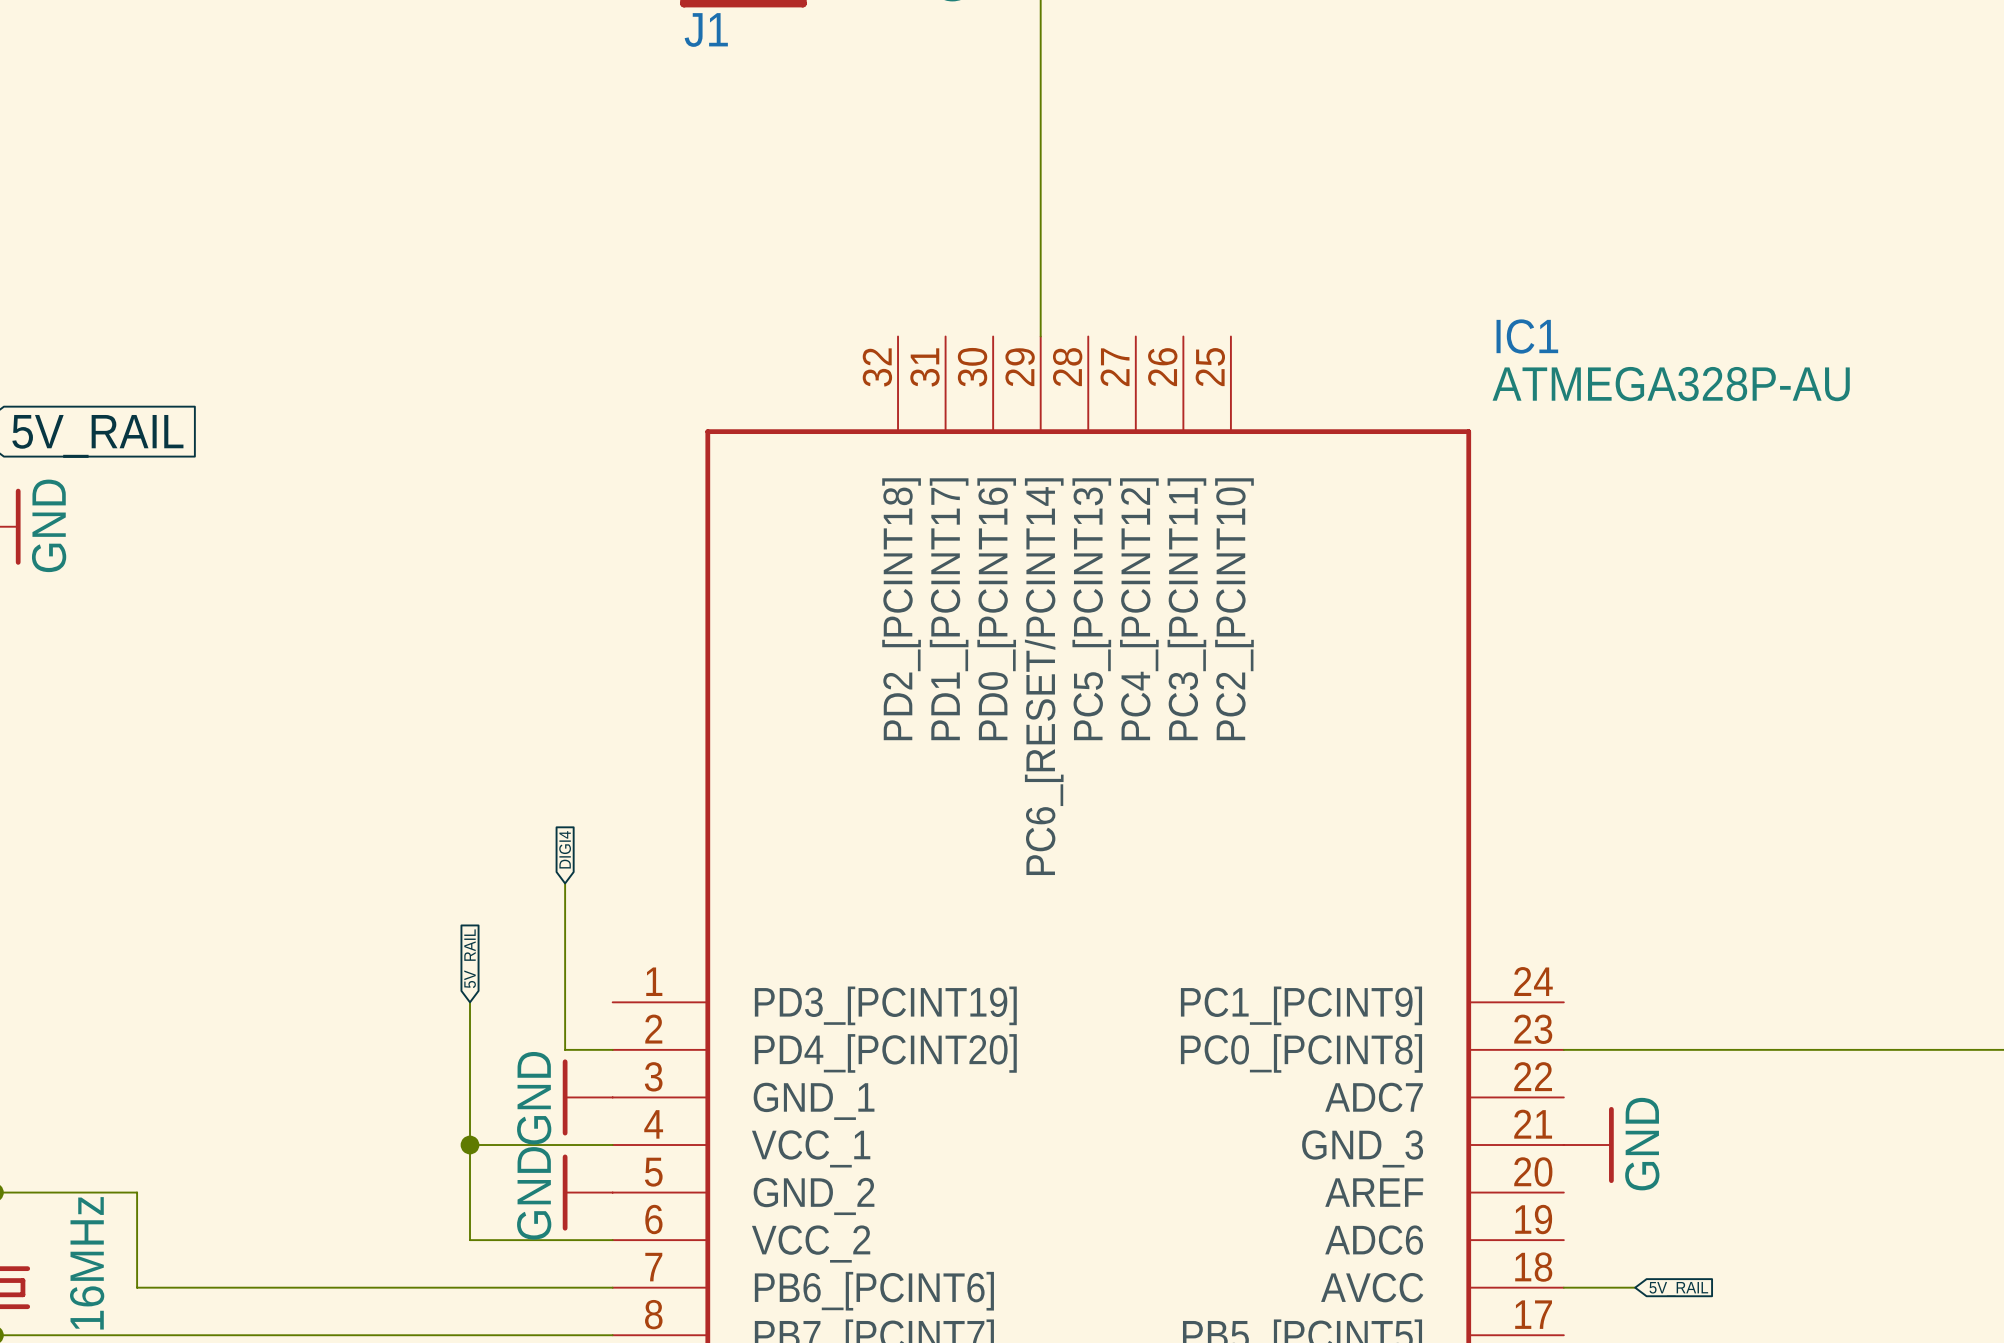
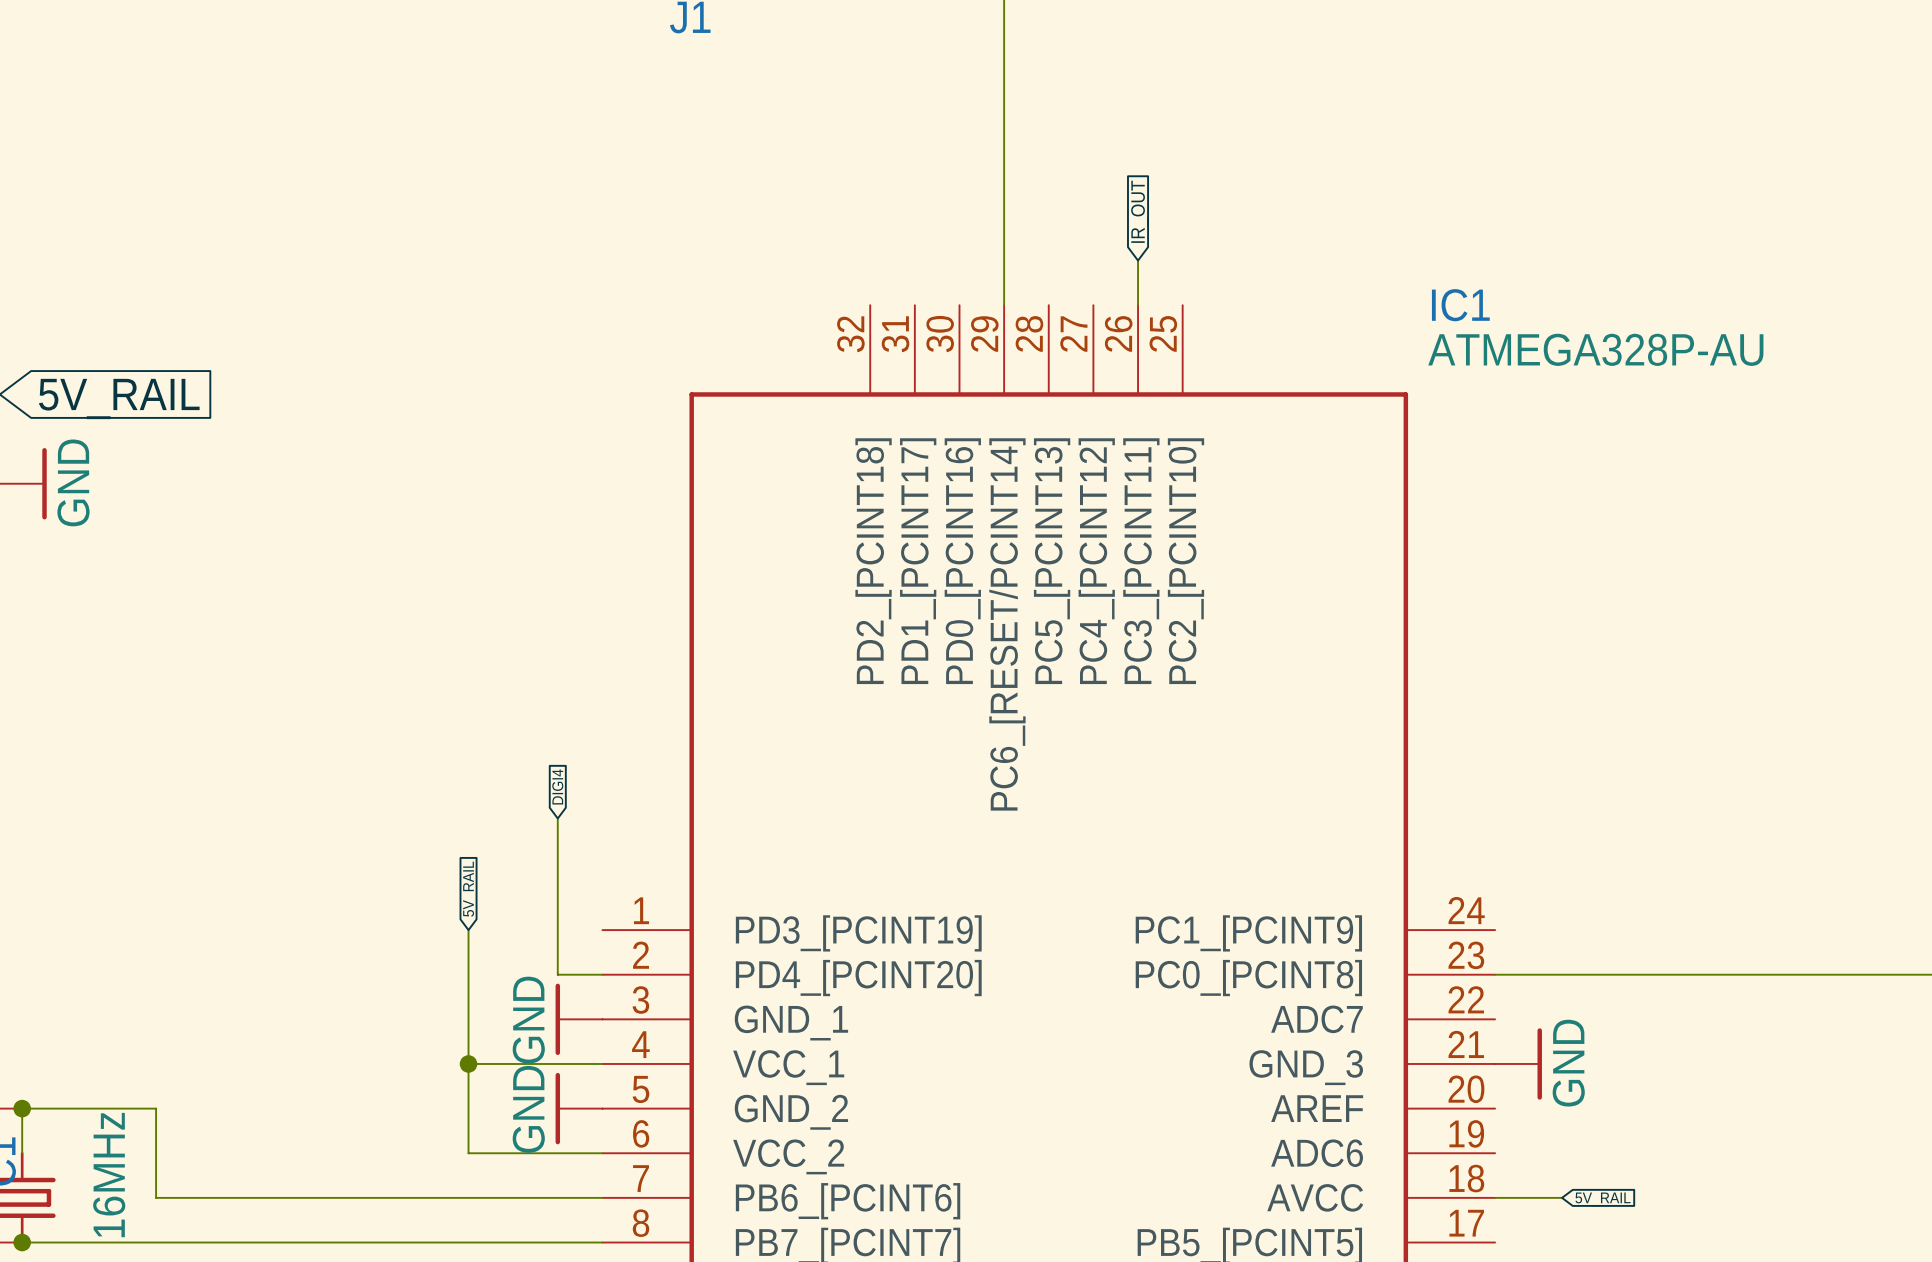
global label: none -> IR_OUT (1139, 211)
wire: none -> (1138, 260) (1138, 305)

